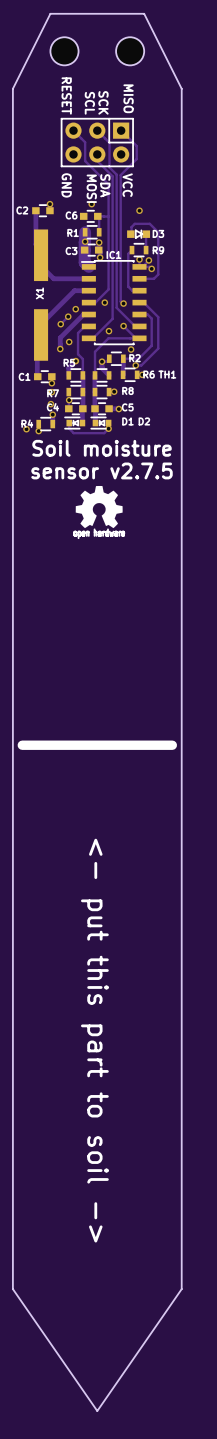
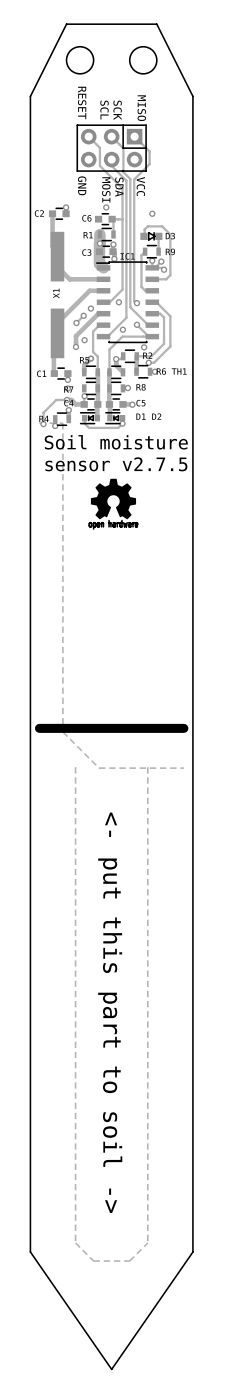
track: none -> (84, 404) (75, 404) (71, 399) (56, 399) (43, 412) (43, 425)
zone outline: none -> (39, 423) (62, 423) (62, 731) (99, 768) (183, 768)
zone outline: none -> (75, 767) (75, 1242) (93, 1261) (129, 1261) (147, 1242) (147, 767)

